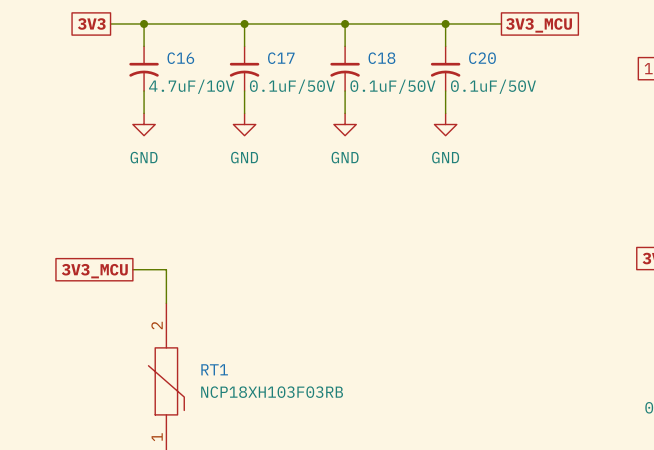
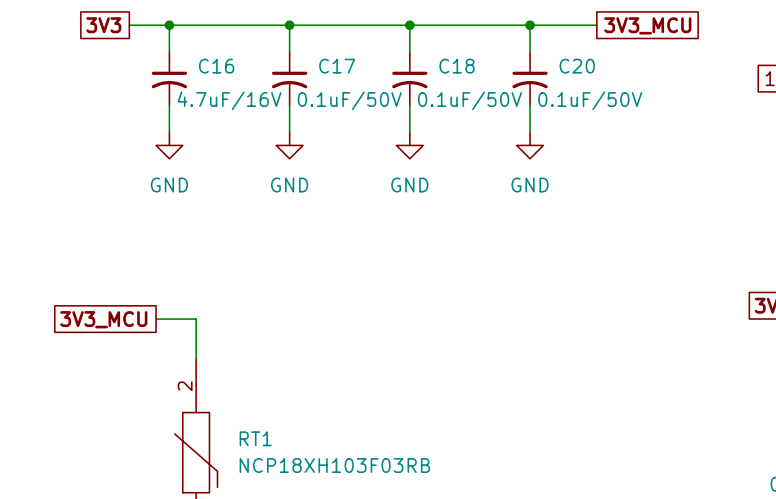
C16 value: 4.7uF/10V (191, 86) -> 4.7uF/16V (229, 100)

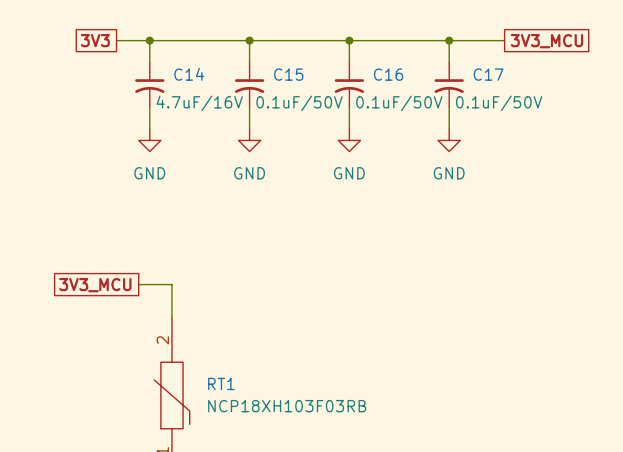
C16 name: C16 (216, 66) -> C14 (189, 74)
C17 name: C17 (337, 66) -> C15 (288, 74)
C18 name: C18 (457, 66) -> C16 (388, 74)
C20 name: C20 (577, 66) -> C17 (488, 74)

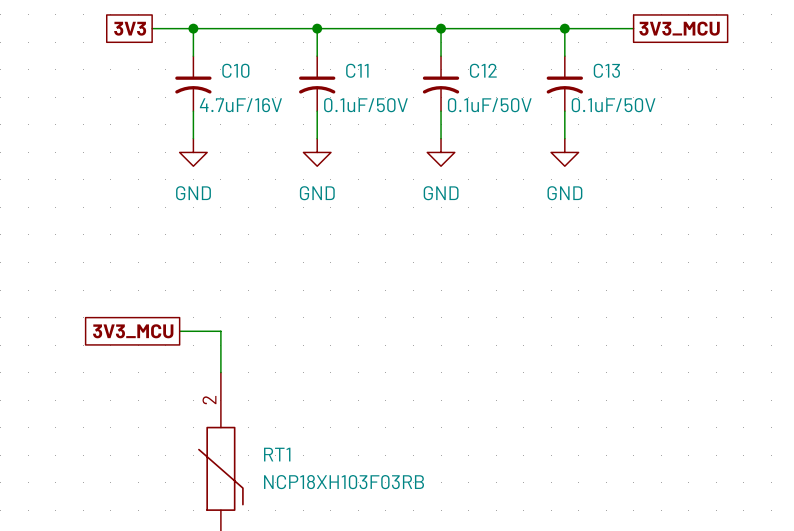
C14 name: C14 (189, 74) -> C10 (235, 70)
C15 name: C15 (288, 74) -> C11 (357, 70)
C16 name: C16 (388, 74) -> C12 (483, 70)
C17 name: C17 (488, 74) -> C13 (606, 70)

